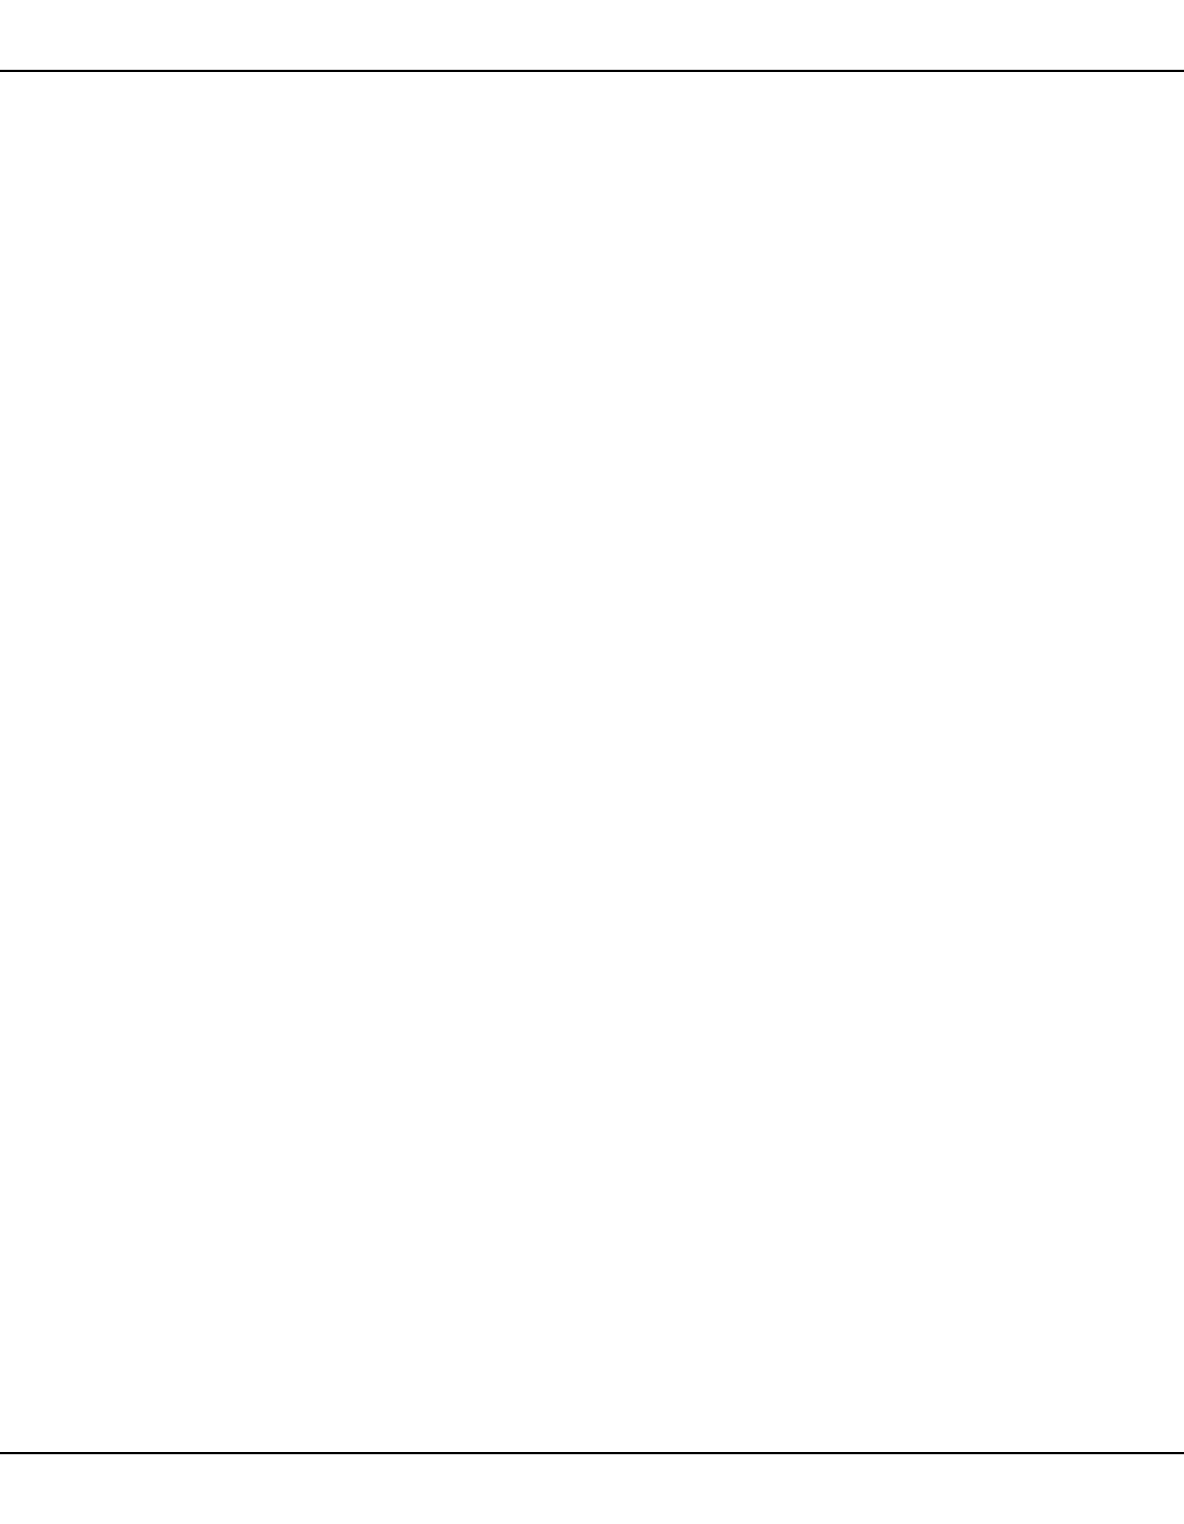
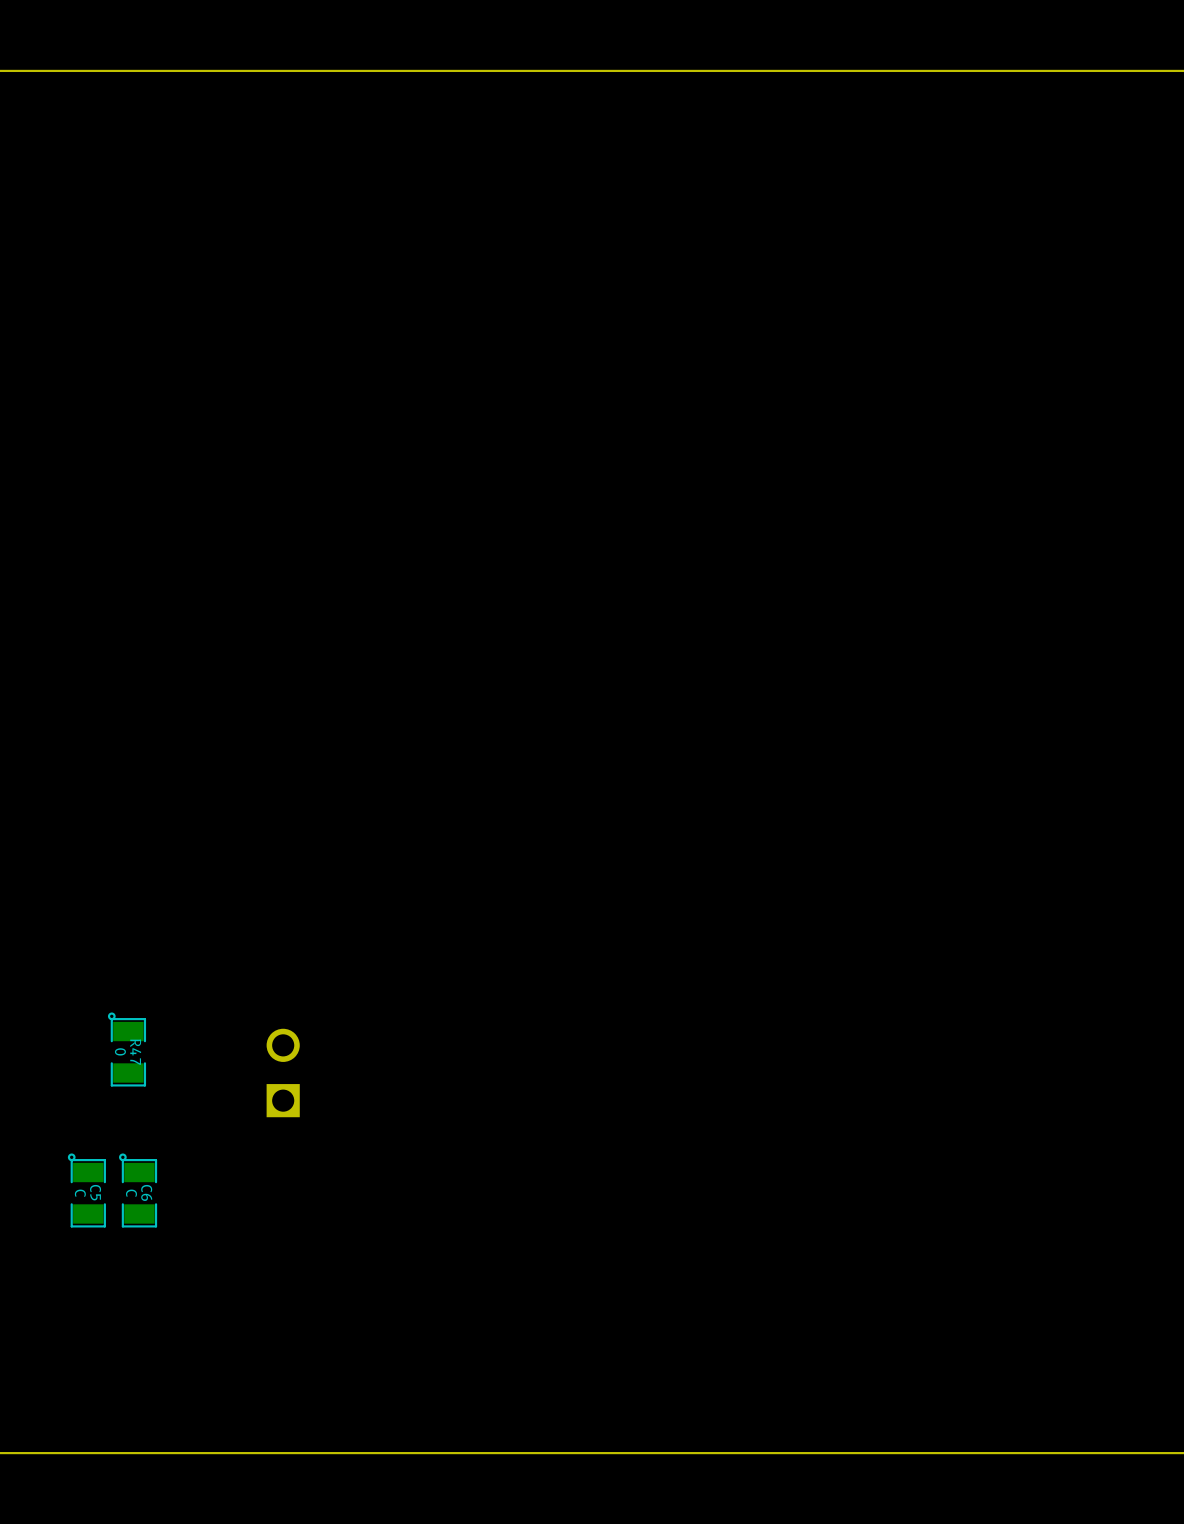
R47: none -> 0 (127, 1049)
part: none -> (283, 1073)
C5: none -> C (86, 1190)
C6: none -> C (138, 1190)

